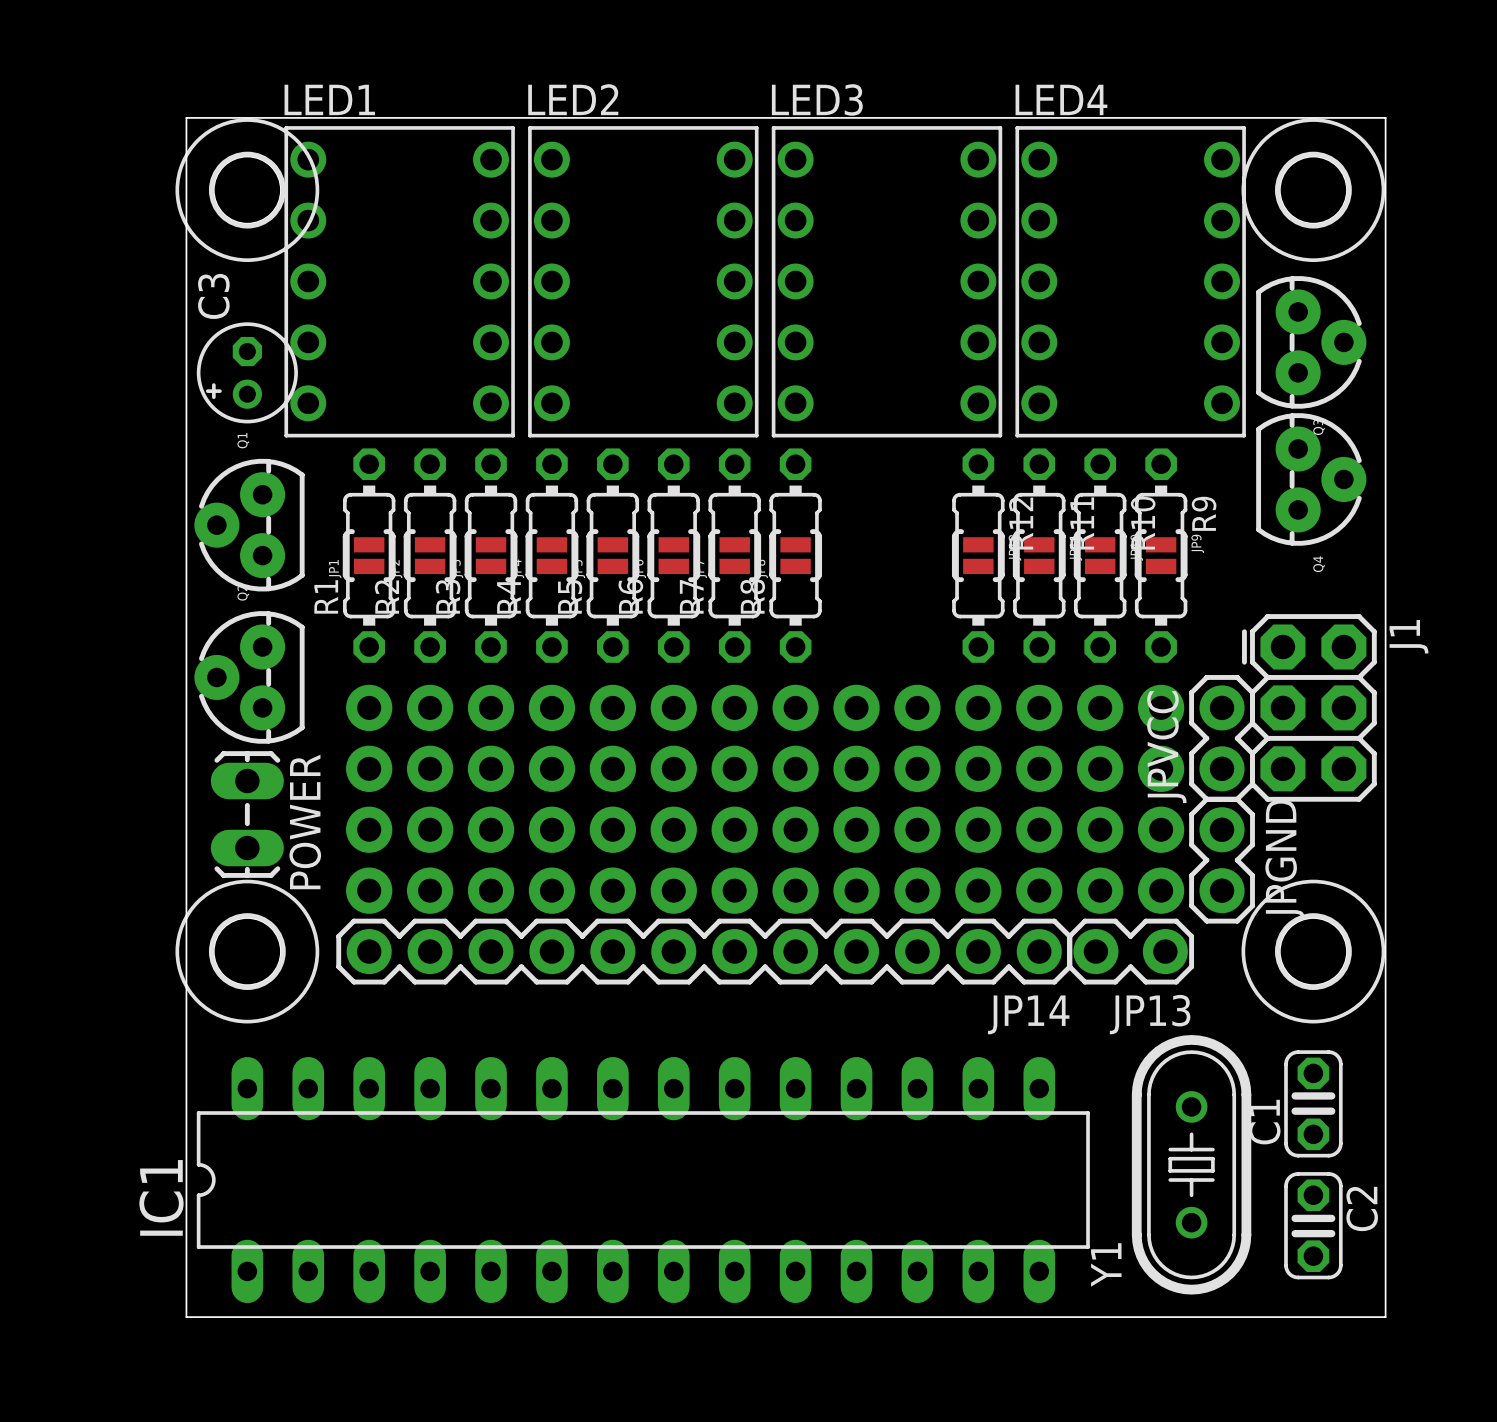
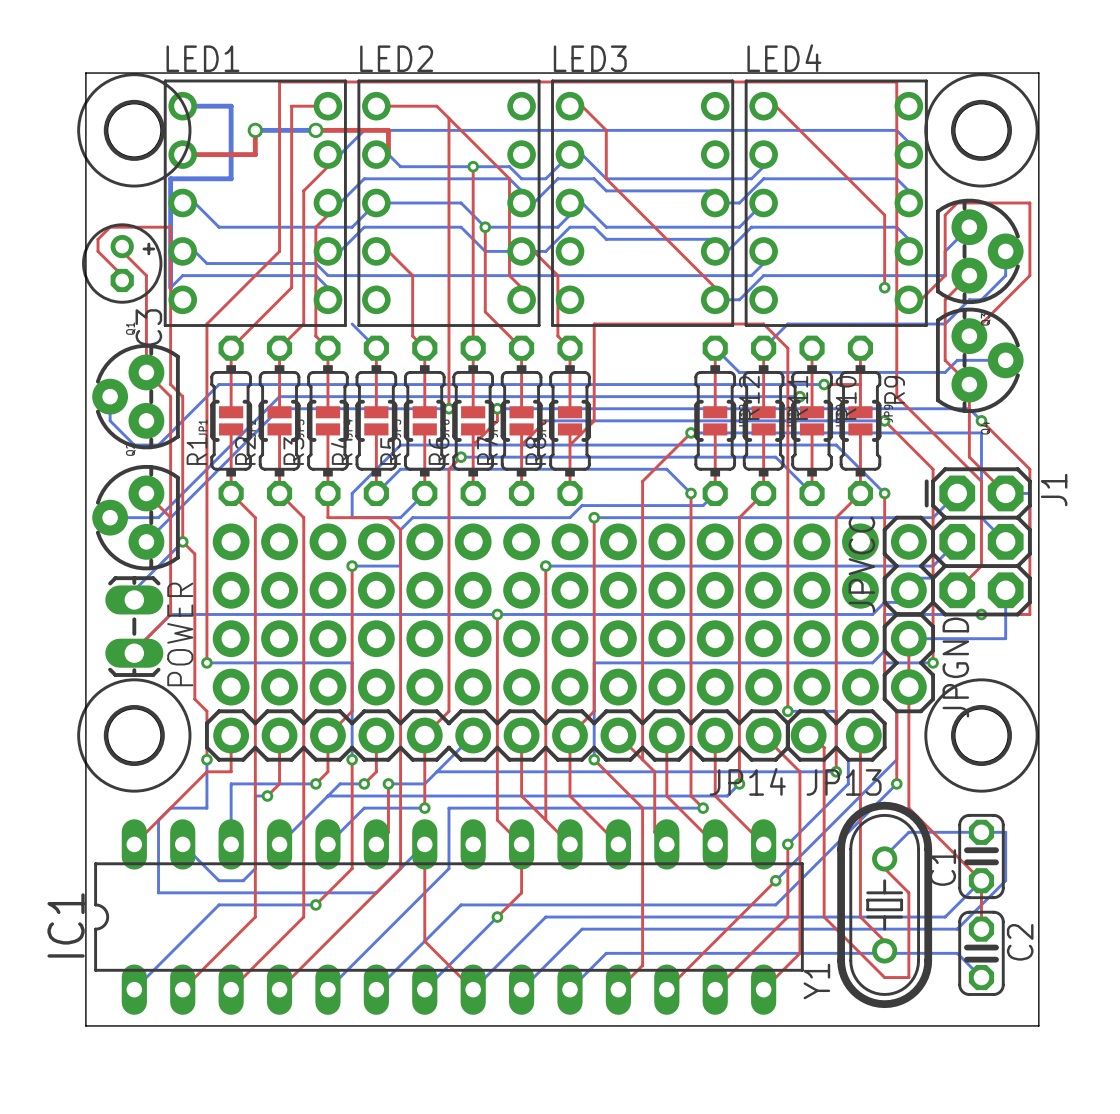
bottom track: none -> (194, 106) (231, 106) (231, 178) (170, 178) (170, 287) (182, 275) (315, 275) (340, 299)
top track: none -> (340, 106) (291, 106) (291, 287) (231, 348) (231, 412)
top track: none -> (388, 106) (436, 106) (509, 178) (509, 275) (533, 299)
top track: none -> (582, 106) (606, 130) (606, 178) (727, 299)
top track: none -> (775, 106) (884, 215) (884, 287)
top track: none -> (448, 118) (448, 408)
top track: none -> (255, 130) (255, 154) (194, 154)
bottom track: none -> (255, 130) (315, 130)
via: none -> (255, 130)
top track: none -> (315, 130) (388, 130) (388, 154)
via: none -> (315, 130)
top track: none -> (340, 154) (303, 190) (303, 324) (279, 348) (279, 412)
bottom track: none -> (340, 154) (364, 130) (896, 130) (920, 154)
bottom track: none -> (388, 154) (400, 166) (509, 166) (521, 178) (545, 178) (570, 154) (582, 154) (606, 178) (751, 178) (775, 154)
top track: none -> (473, 166) (473, 412)
via: none -> (473, 166)
bottom track: none -> (194, 203) (219, 227) (352, 227) (376, 203) (461, 203) (485, 227) (557, 227) (582, 203) (606, 227) (739, 227) (763, 203) (775, 203)
top track: none -> (340, 203) (315, 227) (315, 336) (327, 348) (327, 412)
bottom track: none -> (340, 203) (364, 178) (509, 178) (533, 203) (557, 178) (594, 178) (606, 190) (715, 190) (727, 203) (739, 203) (763, 178) (896, 178) (920, 203)
top track: none -> (485, 227) (485, 311) (521, 348) (521, 412)
via: none -> (485, 227)
bottom track: none -> (969, 227) (945, 251) (945, 275) (763, 275) (739, 299) (727, 299)
top track: none -> (122, 246) (122, 251) (146, 275) (146, 372) (170, 396) (170, 614) (134, 650) (134, 653)
bottom track: none -> (194, 251) (206, 263) (315, 263) (327, 275) (751, 275) (775, 251)
bottom track: none -> (340, 251) (364, 227) (461, 227) (485, 251) (545, 251) (570, 227) (594, 227) (606, 239) (715, 239) (727, 251) (751, 227) (896, 227) (920, 251)
top track: none -> (388, 251) (412, 275) (412, 336) (424, 348) (424, 412)
top track: none -> (533, 251) (557, 275) (557, 336) (570, 348) (570, 412)
bottom track: none -> (1005, 251) (1005, 275) (981, 299) (969, 299) (945, 324) (787, 324) (763, 348)
C3 rotation: 0° (247, 372) -> 180° (122, 263)
top track: none -> (969, 275) (945, 299) (945, 360) (969, 384) (969, 457) (1005, 493)
top track: none -> (122, 280) (122, 275) (98, 251) (98, 239) (110, 227) (170, 227) (170, 384) (182, 396) (182, 541) (194, 553) (194, 699) (206, 711) (206, 759)
via: none -> (884, 287)
top track: none -> (920, 299) (945, 275) (945, 215) (957, 203) (1029, 203) (1029, 275) (969, 336)
bottom track: none -> (352, 324) (376, 348)
top track: none -> (376, 348) (376, 412)
top track: none -> (715, 348) (715, 412)
bottom track: none -> (715, 348) (739, 372) (945, 372) (957, 360) (1005, 360)
top track: none -> (763, 348) (763, 412)
top track: none -> (812, 348) (812, 412)
top track: none -> (860, 348) (860, 412)
top track: none -> (824, 384) (860, 384)
bottom track: none -> (824, 384) (219, 384) (158, 445) (134, 445) (110, 420) (110, 396)
via: none -> (824, 384)
bottom track: none -> (799, 396) (279, 396) (158, 517) (110, 517)
via: none -> (799, 396)
bottom track: none -> (448, 408) (279, 408) (146, 541)
via: none -> (448, 408)
top track: none -> (497, 408) (497, 420) (473, 445)
bottom track: none -> (497, 408) (969, 408) (981, 420)
via: none -> (497, 408)
top track: none -> (545, 420) (521, 445)
bottom track: none -> (545, 420) (884, 420)
top track: none -> (884, 420) (933, 469) (933, 662)
via: none -> (884, 420)
top track: none -> (981, 420) (1029, 469) (1029, 614) (981, 614)
via: none -> (981, 420)
top track: none -> (231, 429) (231, 493) (255, 517) (255, 917) (182, 989)
top track: none -> (279, 429) (279, 493) (303, 517) (303, 917) (231, 989)
top track: none -> (327, 429) (327, 517) (388, 517) (400, 529) (400, 868) (279, 989)
top track: none -> (376, 429) (376, 493)
top track: none -> (424, 429) (424, 493)
top track: none -> (473, 429) (473, 493)
top track: none -> (521, 429) (521, 493)
top track: none -> (570, 429) (570, 493)
top track: none -> (715, 429) (715, 493)
top track: none -> (763, 429) (763, 493) (739, 517) (739, 783)
top track: none -> (812, 429) (812, 493)
top track: none -> (860, 429) (860, 493) (836, 517) (836, 771)
top track: none -> (691, 432) (642, 481) (642, 759)
bottom track: none -> (691, 432) (981, 432) (981, 517) (1005, 541)
via: none -> (691, 432)
top track: none -> (570, 445) (594, 420) (594, 324) (763, 324) (787, 348) (787, 711)
top track: none -> (461, 457) (448, 469) (448, 711) (424, 735) (424, 808)
bottom track: none -> (461, 457) (775, 457) (812, 493)
via: none -> (461, 457)
top track: none -> (146, 493) (170, 517)
bottom track: none -> (376, 493) (400, 469) (666, 469) (691, 493)
bottom track: none -> (424, 493) (400, 517) (352, 517) (352, 493) (400, 445) (836, 445) (884, 493)
top track: none -> (691, 493) (691, 796) (703, 808)
via: none -> (691, 493)
bottom track: none -> (715, 493) (703, 505) (582, 505) (570, 517) (412, 517) (400, 529) (400, 566) (352, 566)
top track: none -> (884, 493) (884, 699) (896, 711) (896, 783)
via: none -> (884, 493)
bottom track: none -> (957, 493) (933, 517) (594, 517)
bottom track: none -> (1005, 493) (1029, 493) (1029, 553) (1017, 566) (945, 566) (933, 578) (920, 578) (896, 602) (884, 602) (872, 614) (170, 614) (134, 650) (134, 653)
top track: none -> (594, 517) (594, 711) (570, 735) (570, 796) (618, 844)
via: none -> (594, 517)
bottom track: none -> (182, 541) (134, 590) (134, 599)
via: none -> (182, 541)
bottom track: none -> (957, 541) (933, 566) (545, 566)
top track: none -> (352, 566) (352, 711) (327, 735) (327, 771) (315, 783)
via: none -> (352, 566)
top track: none -> (545, 566) (545, 820)
via: none -> (545, 566)
top track: none -> (957, 590) (981, 566) (981, 481) (896, 396) (896, 81) (279, 81) (279, 251) (206, 324) (206, 662)
bottom track: none -> (1005, 590) (1005, 638) (908, 638)
top track: none -> (497, 614) (497, 820) (521, 844) (521, 892) (497, 917)
via: none -> (497, 614)
bottom track: none -> (981, 614) (884, 614) (884, 650) (872, 662) (594, 662) (594, 759)
via: none -> (981, 614)
top track: none -> (908, 638) (908, 808) (981, 880) (981, 929)
bottom track: none -> (206, 662) (352, 662) (352, 759)
via: none -> (206, 662)
bottom track: none -> (933, 662) (884, 662) (884, 699) (896, 711) (896, 759) (775, 880)
via: none -> (933, 662)
bottom track: none -> (787, 711) (836, 711) (836, 747) (848, 759) (848, 783) (787, 844)
via: none -> (787, 711)
top track: none -> (231, 735) (231, 771) (206, 771) (134, 844)
top track: none -> (279, 735) (279, 783) (267, 796)
top track: none -> (376, 735) (376, 771) (364, 783)
bottom track: none -> (473, 735) (424, 783) (388, 783)
top track: none -> (521, 735) (521, 796) (570, 844)
top track: none -> (618, 735) (654, 771) (654, 832) (666, 844)
top track: none -> (666, 735) (666, 796) (715, 844)
top track: none -> (715, 735) (715, 796) (763, 844)
top track: none -> (763, 735) (799, 771) (799, 953) (763, 989)
top track: none -> (808, 735) (812, 735) (824, 747) (824, 917) (884, 977) (908, 977) (908, 892) (884, 868) (884, 858)
top track: none -> (863, 735) (860, 735) (860, 917) (884, 941) (884, 950)
bottom track: none -> (206, 759) (206, 808) (170, 808) (158, 820) (158, 892) (376, 892) (424, 844)
via: none -> (206, 759)
top track: none -> (352, 759) (352, 868) (315, 904)
via: none -> (352, 759)
top track: none -> (594, 759) (642, 808) (642, 965) (618, 989)
via: none -> (594, 759)
bottom track: none -> (436, 771) (836, 771)
via: none -> (836, 771)
bottom track: none -> (315, 783) (231, 783) (231, 844)
via: none -> (315, 783)
bottom track: none -> (364, 783) (340, 783) (279, 844)
via: none -> (364, 783)
top track: none -> (388, 783) (388, 832) (376, 844)
via: none -> (388, 783)
bottom track: none -> (739, 783) (727, 796) (327, 796)
via: none -> (739, 783)
bottom track: none -> (896, 783) (775, 904) (461, 904) (376, 989)
via: none -> (896, 783)
bottom track: none -> (267, 796) (255, 796) (255, 868) (243, 880) (219, 880) (182, 844)
via: none -> (267, 796)
bottom track: none -> (424, 808) (364, 808) (327, 844)
via: none -> (424, 808)
bottom track: none -> (703, 808) (448, 808) (448, 868) (327, 989)
via: none -> (703, 808)
top track: none -> (424, 844) (424, 941) (473, 989)
top track: none -> (787, 844) (787, 917) (715, 989)
via: none -> (787, 844)
bottom track: none -> (884, 858) (884, 856) (908, 832) (1005, 832) (1005, 880) (957, 929) (582, 929) (521, 989)
top track: none -> (775, 880) (666, 989)
via: none -> (775, 880)
bottom track: none -> (981, 880) (945, 917) (545, 917) (473, 989)
bottom track: none -> (315, 904) (219, 904) (134, 989)
via: none -> (315, 904)
bottom track: none -> (497, 917) (424, 989)
via: none -> (497, 917)
bottom track: none -> (981, 977) (957, 953) (606, 953) (570, 989)

